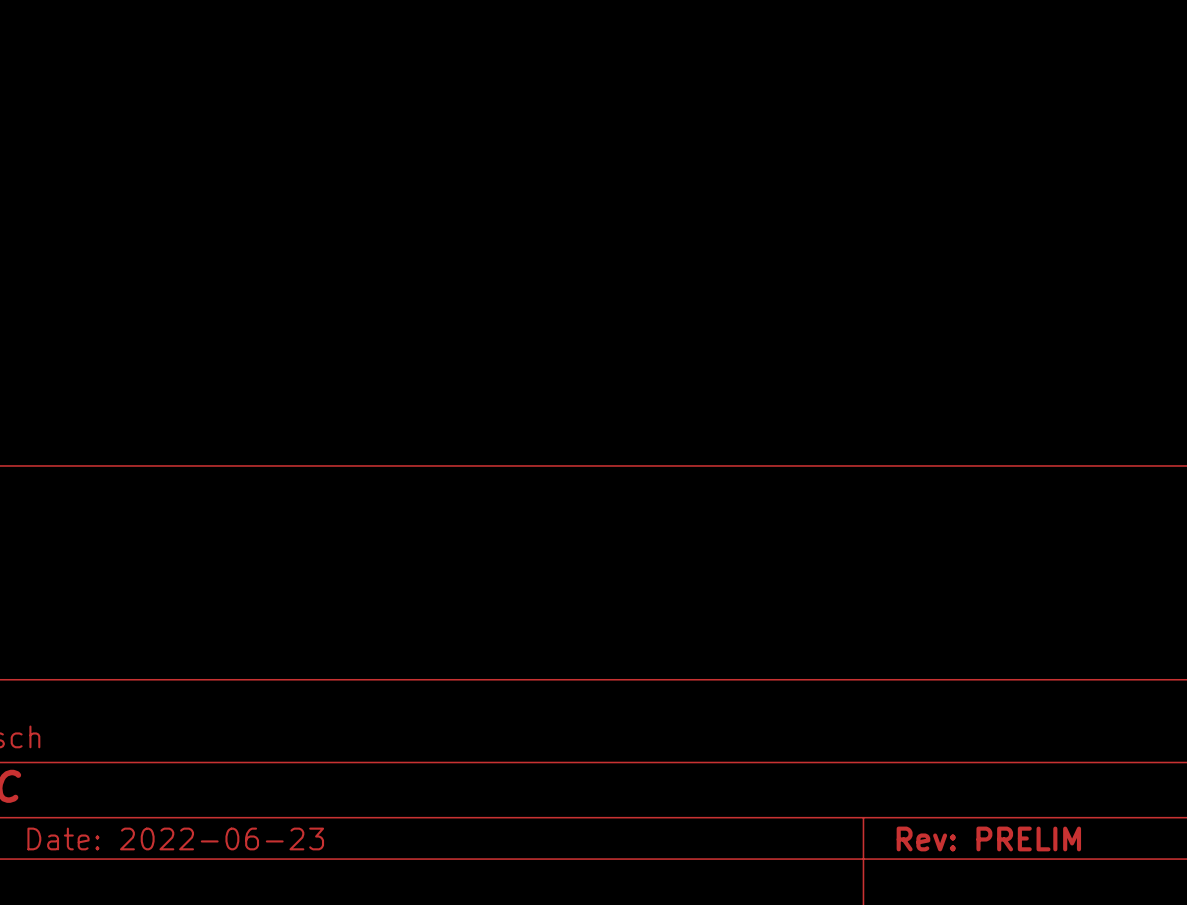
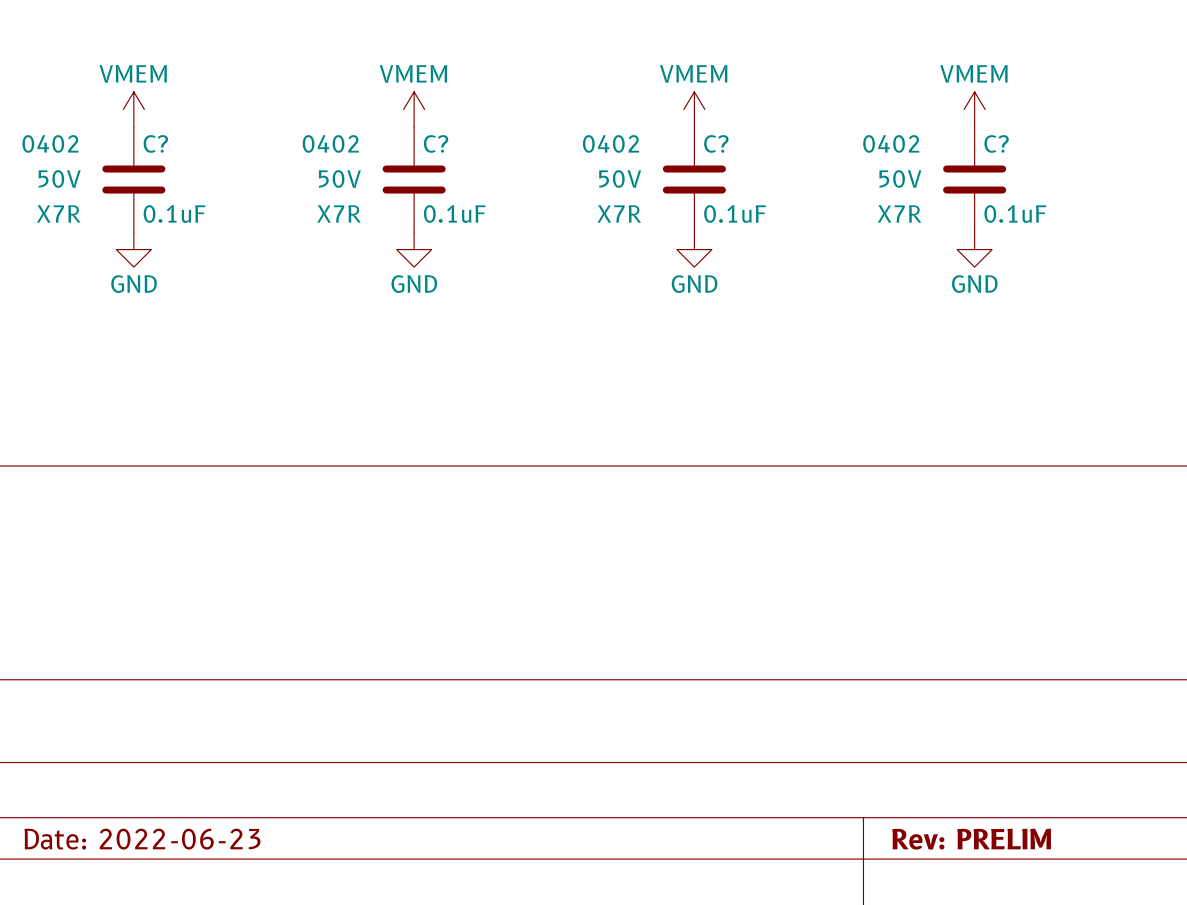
power symbol: none -> VMEM (133, 109)
power symbol: none -> VMEM (414, 109)
power symbol: none -> VMEM (694, 109)
power symbol: none -> VMEM (974, 109)
C?: none -> 0.1uF (133, 179)
C?: none -> 0.1uF (414, 179)
C?: none -> 0.1uF (694, 179)
C?: none -> 0.1uF (974, 179)
power symbol: none -> GND (133, 249)
power symbol: none -> GND (414, 249)
power symbol: none -> GND (694, 249)
power symbol: none -> GND (974, 249)

